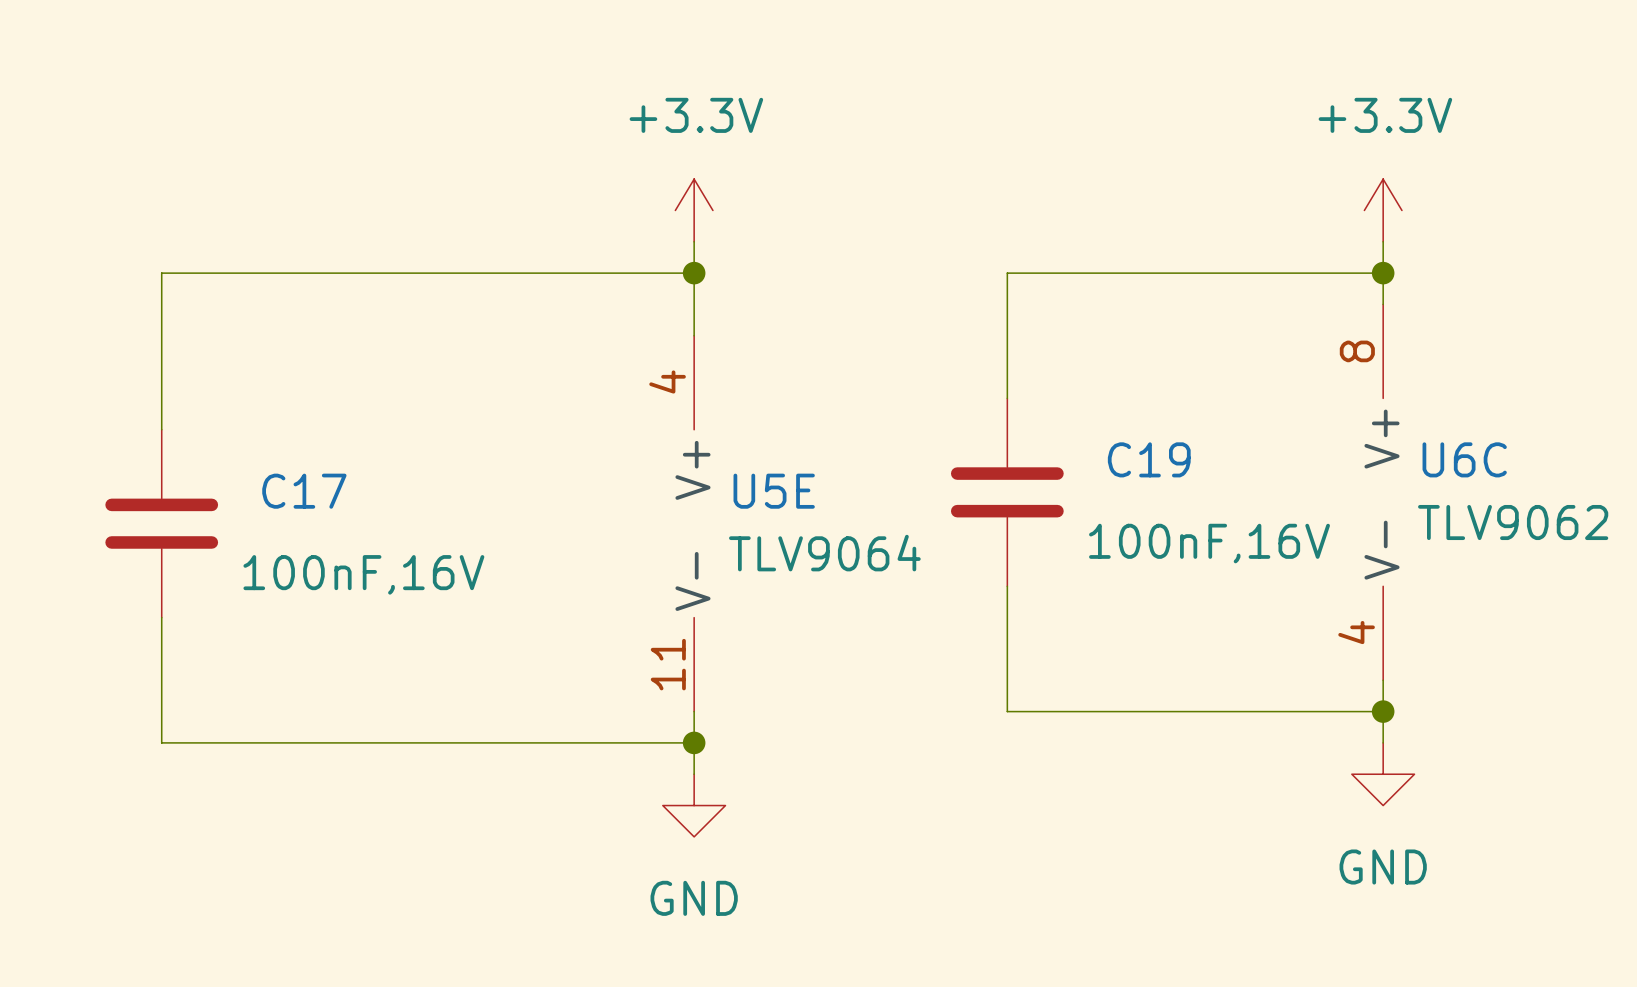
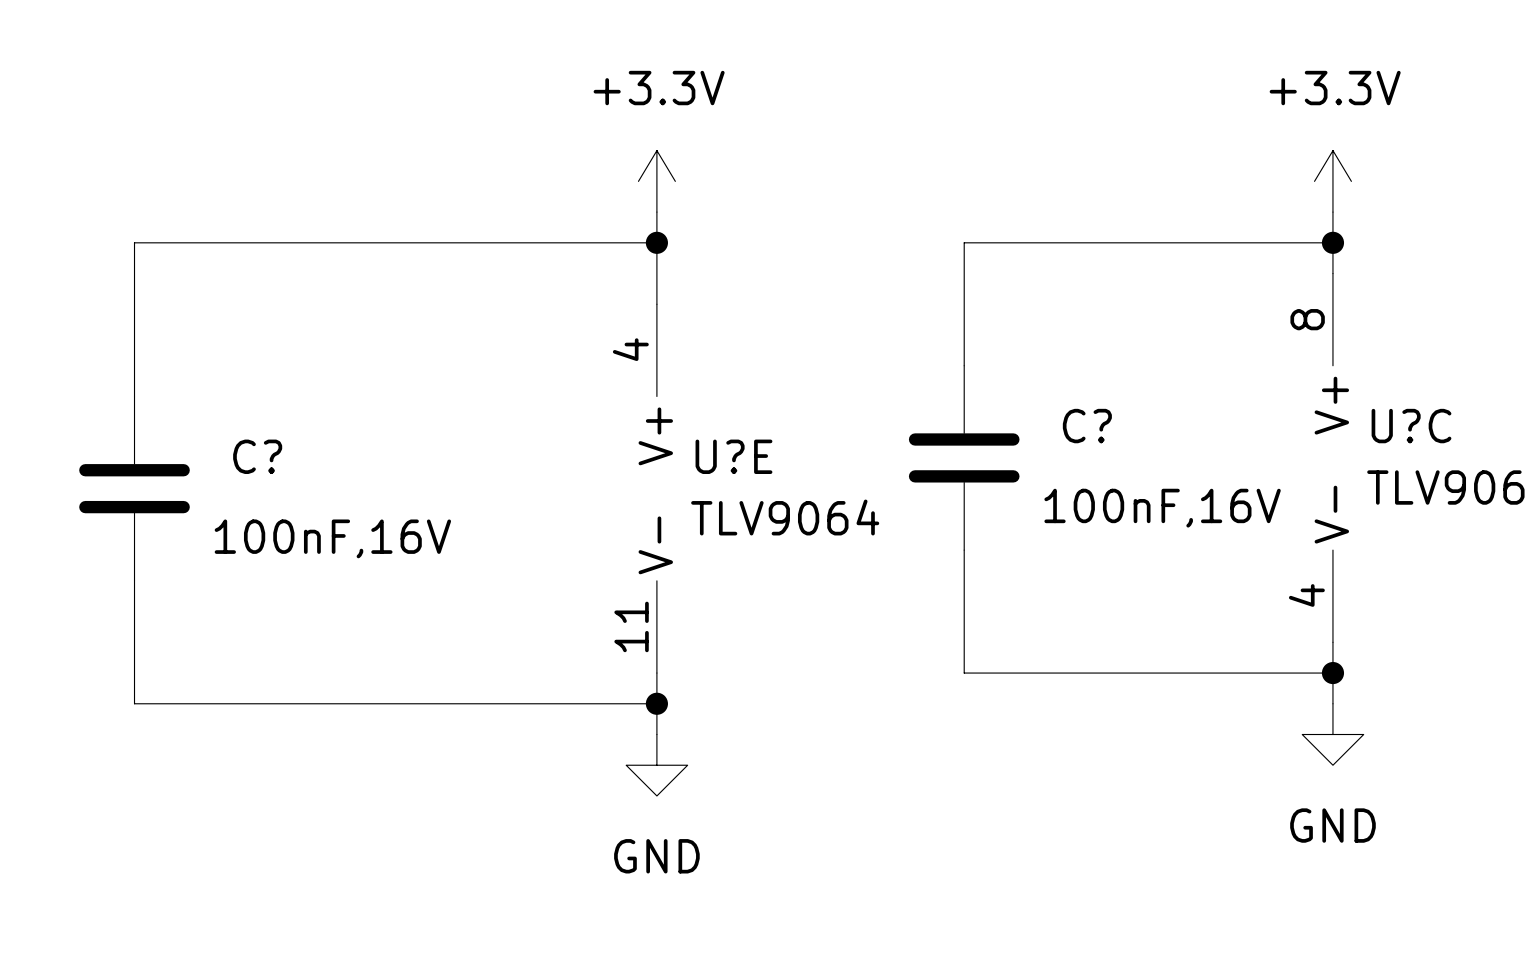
C19 name: C19 (1149, 459) -> C? (1087, 426)
U6C name: U6C (1464, 459) -> U?C (1411, 426)
C17 name: C17 (304, 491) -> C? (257, 456)
U5E name: U5E (774, 491) -> U?E (733, 456)

